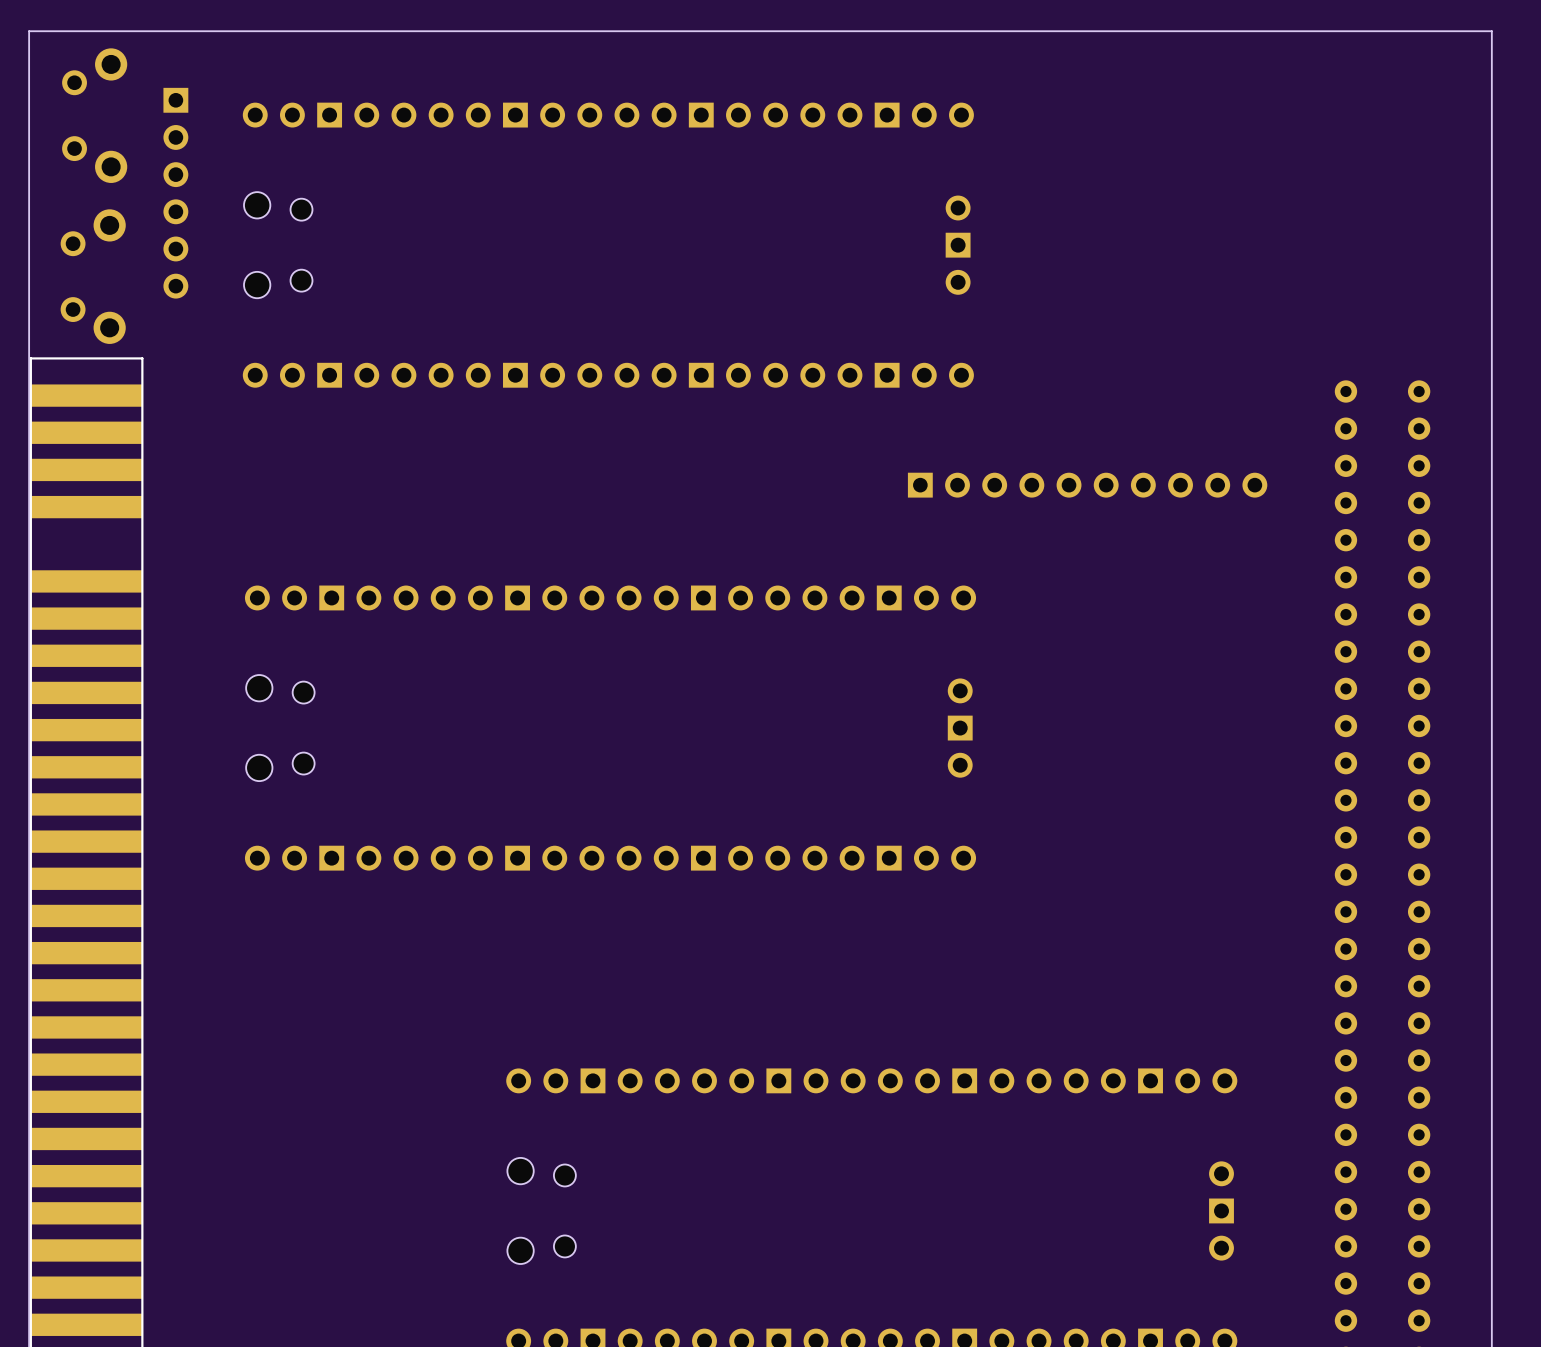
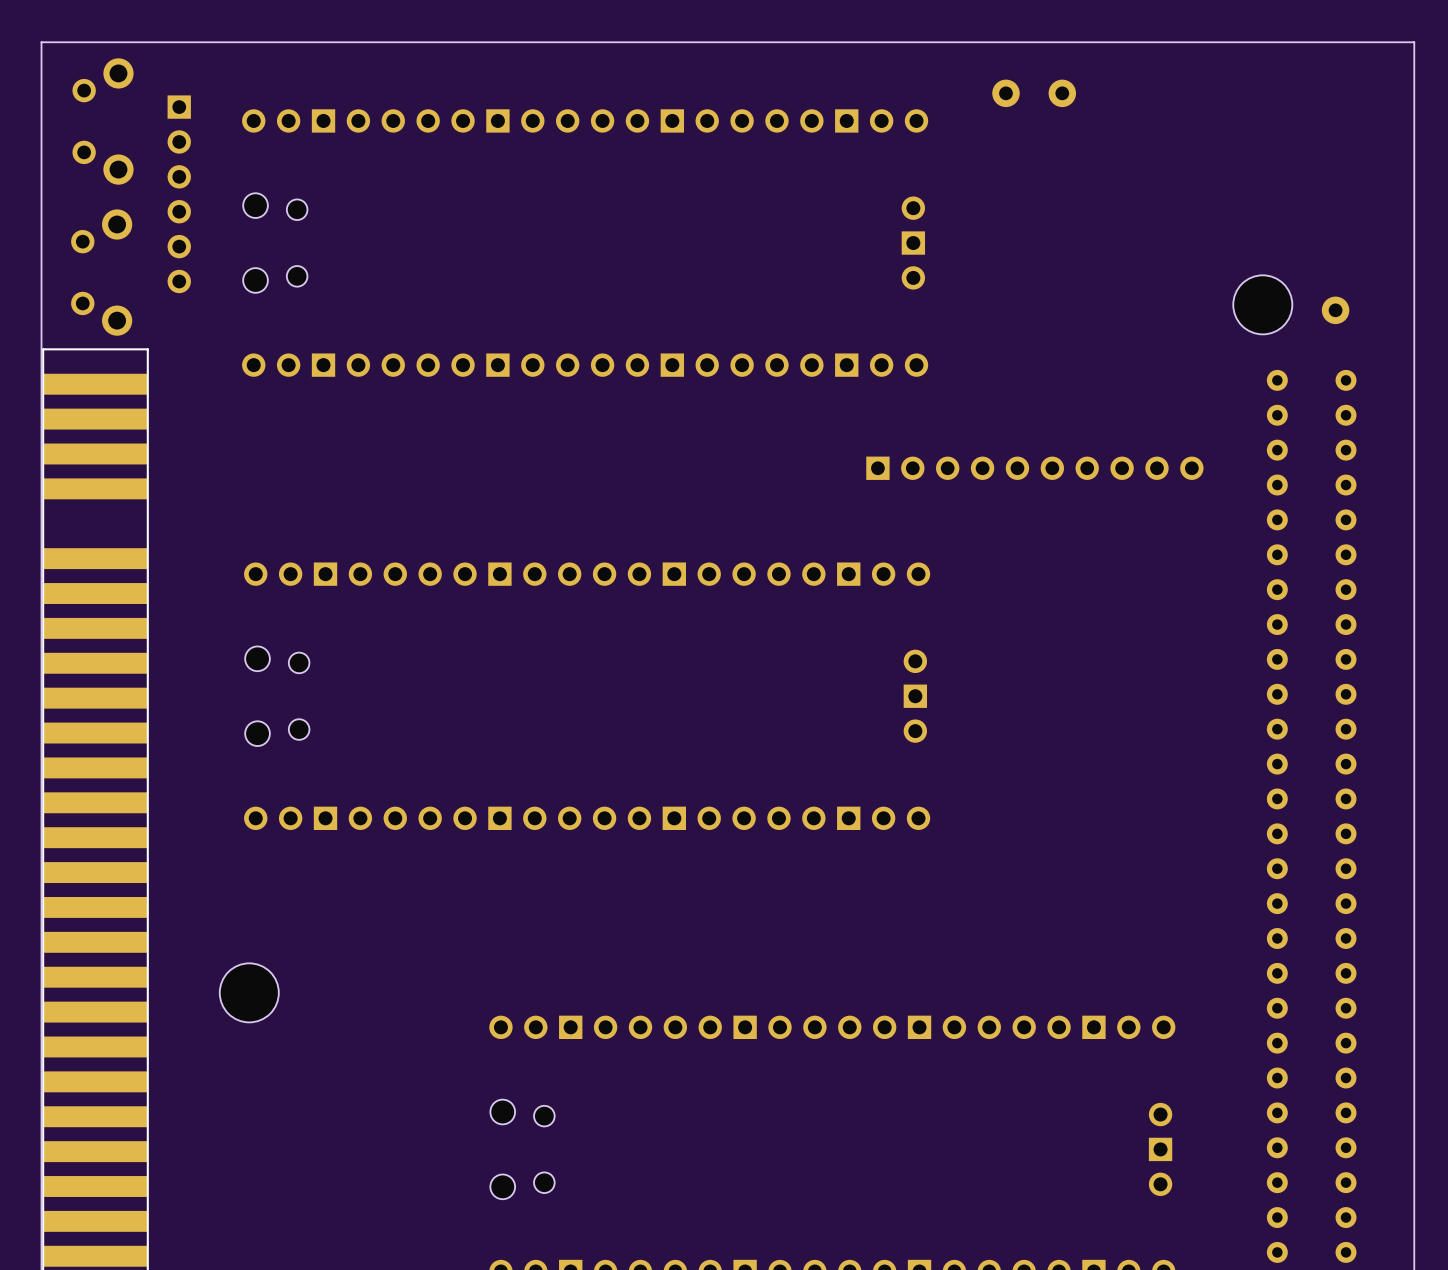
part: none -> (1005, 93)
part: none -> (1062, 93)
part: none -> (1262, 304)
part: none -> (1335, 310)
part: none -> (249, 992)

